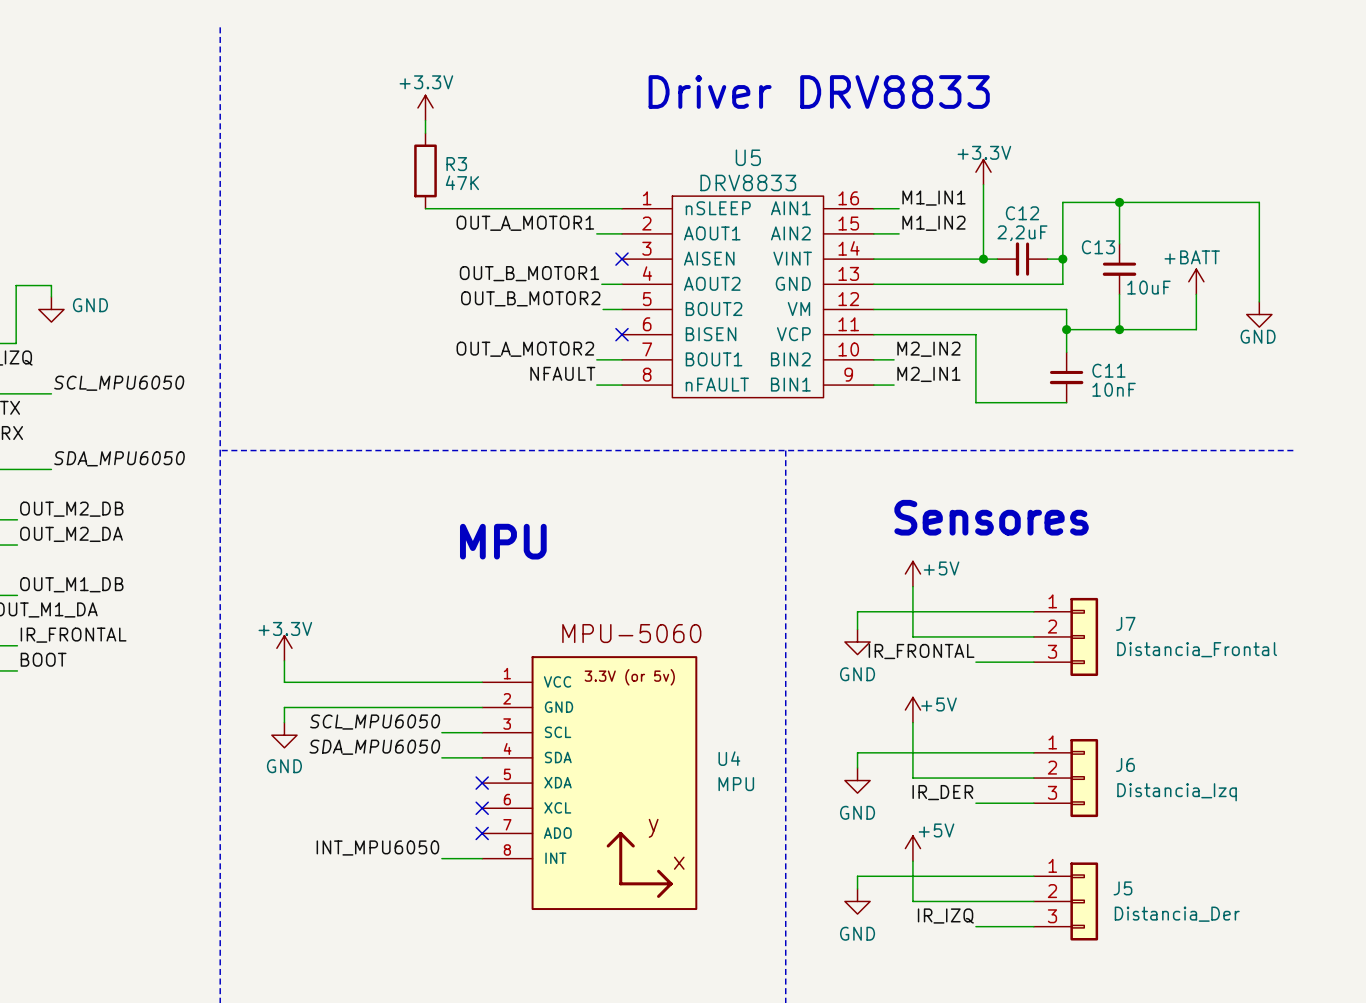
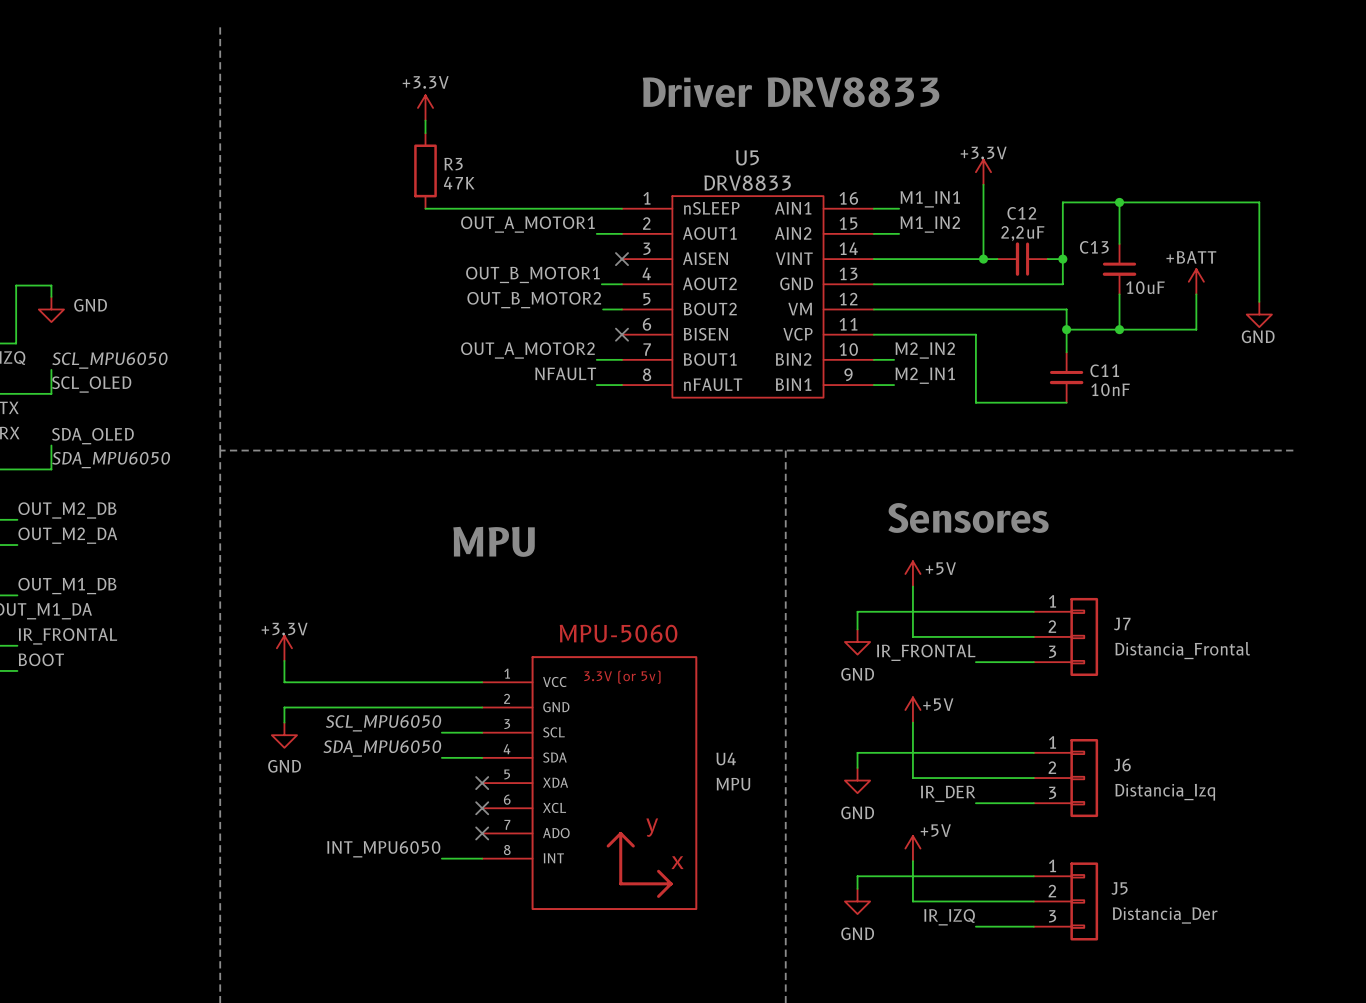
label: none -> SCL_MPU6050 (109, 360)
wire: none -> (51, 369) (51, 393)
label: SCL_MPU6050 (119, 383) -> SCL_OLED (91, 384)
label: none -> SDA_OLED (92, 436)
wire: none -> (51, 445) (51, 469)

